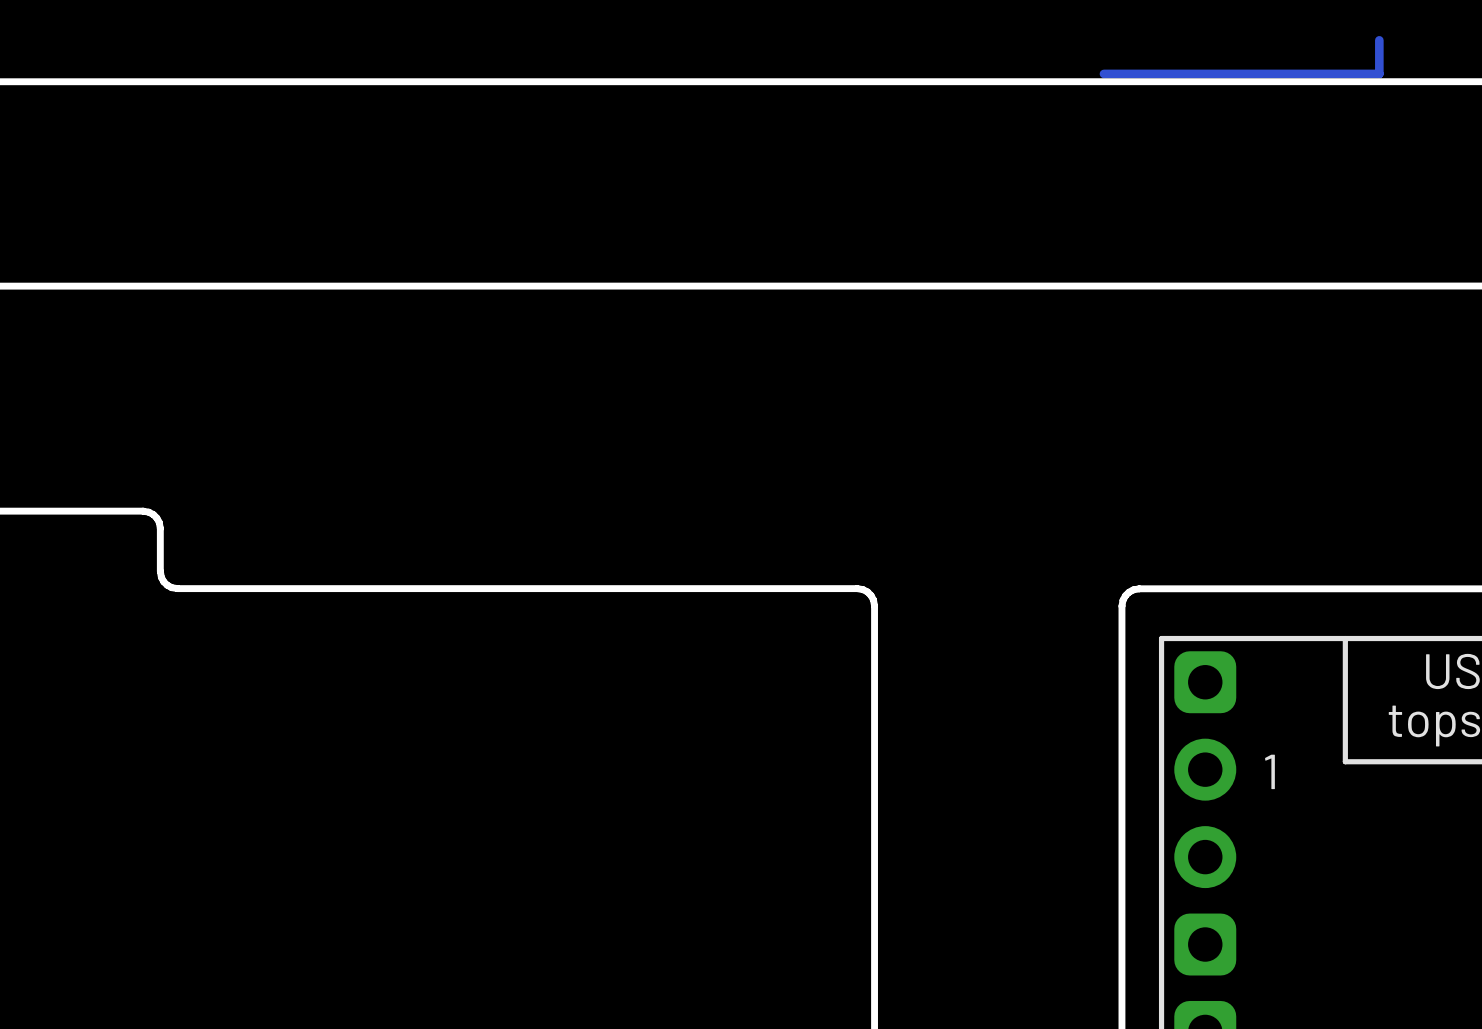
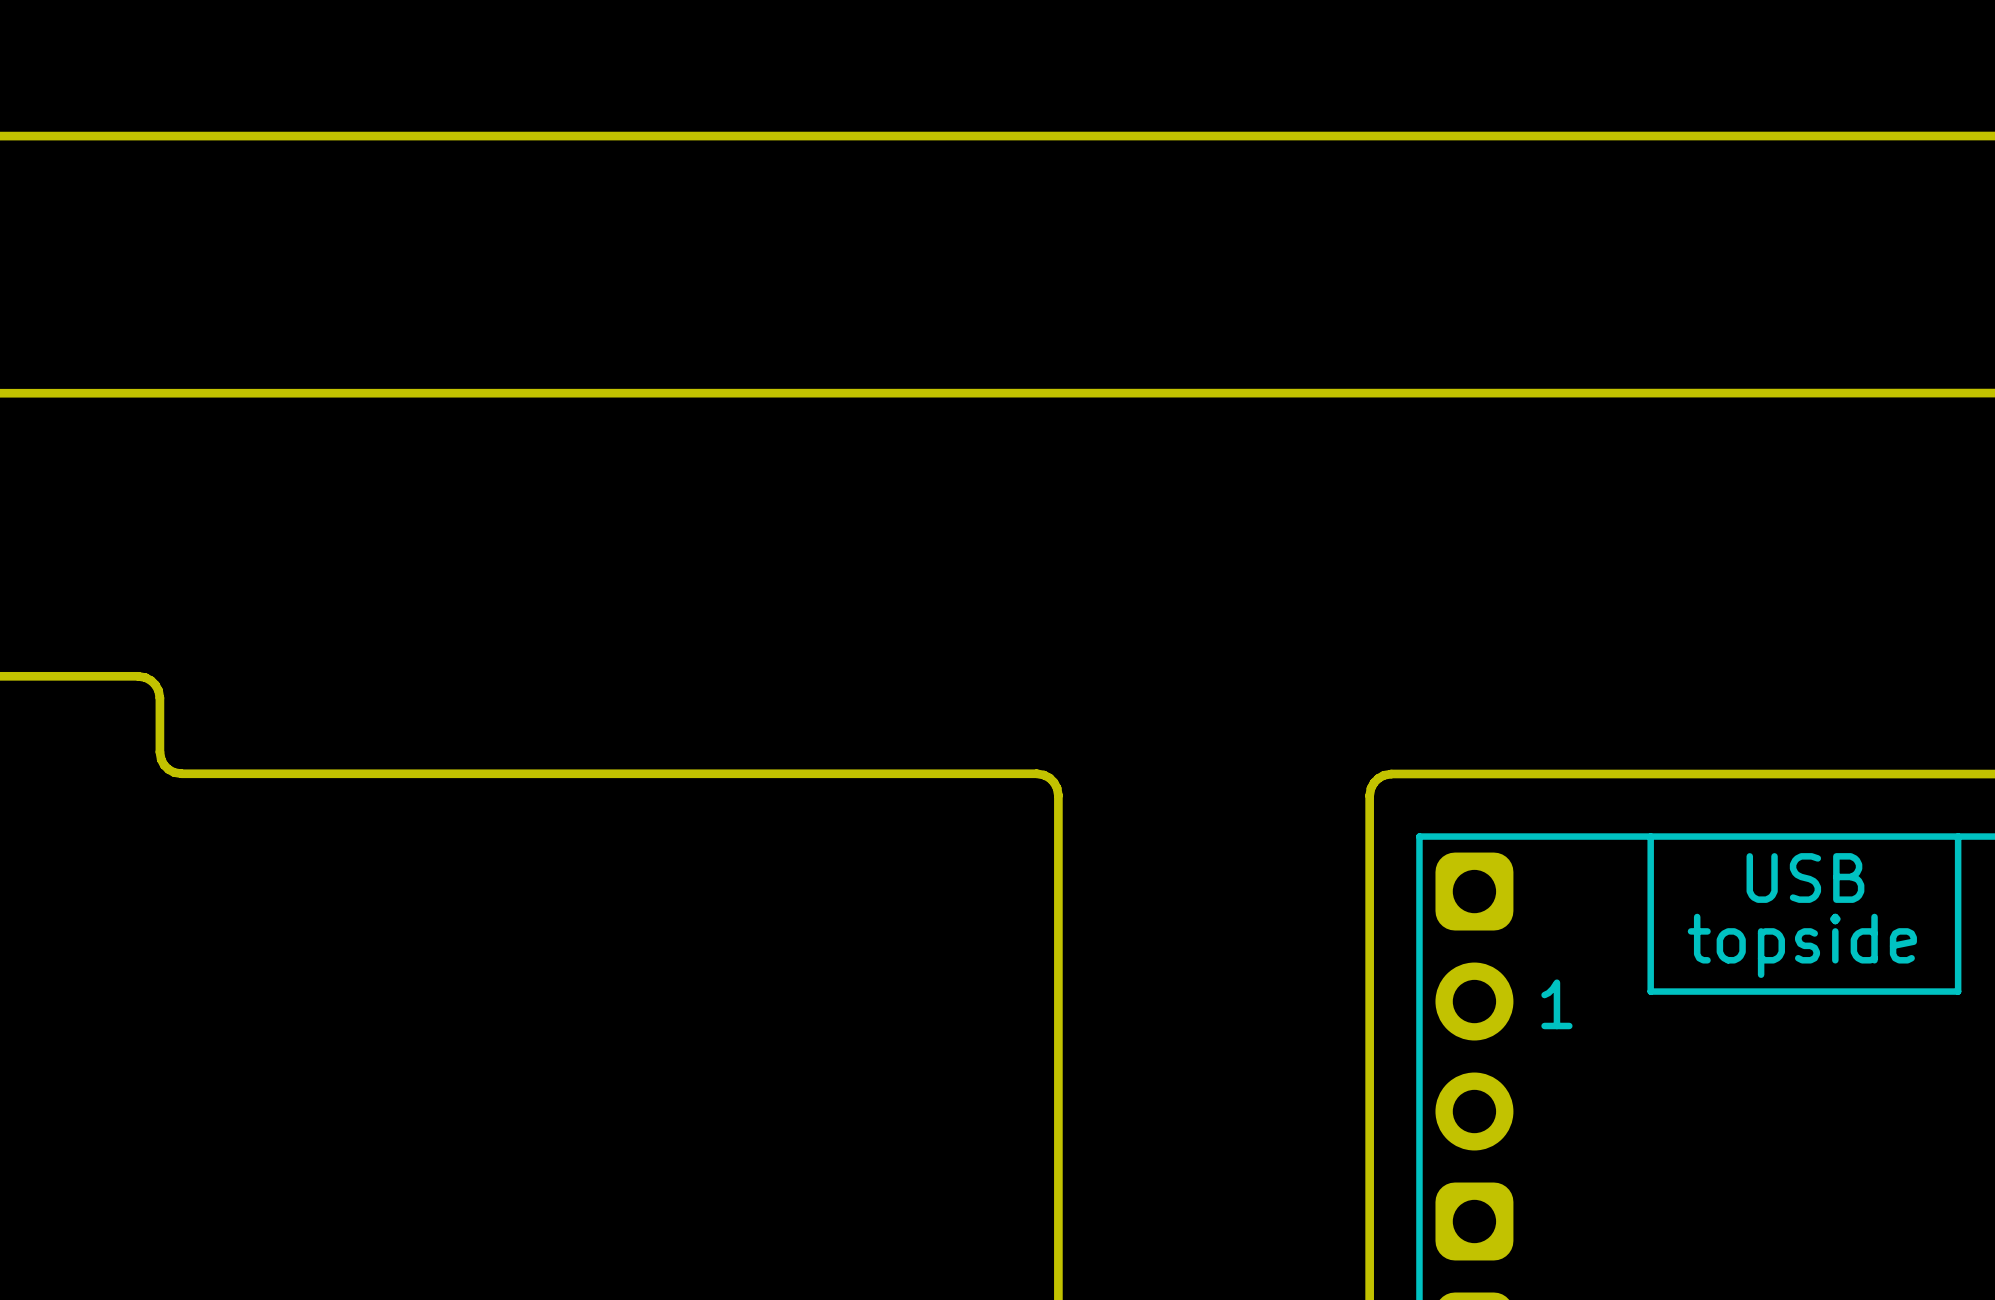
bottom track: (1379, 40) (1379, 73) (1103, 73) -> none

